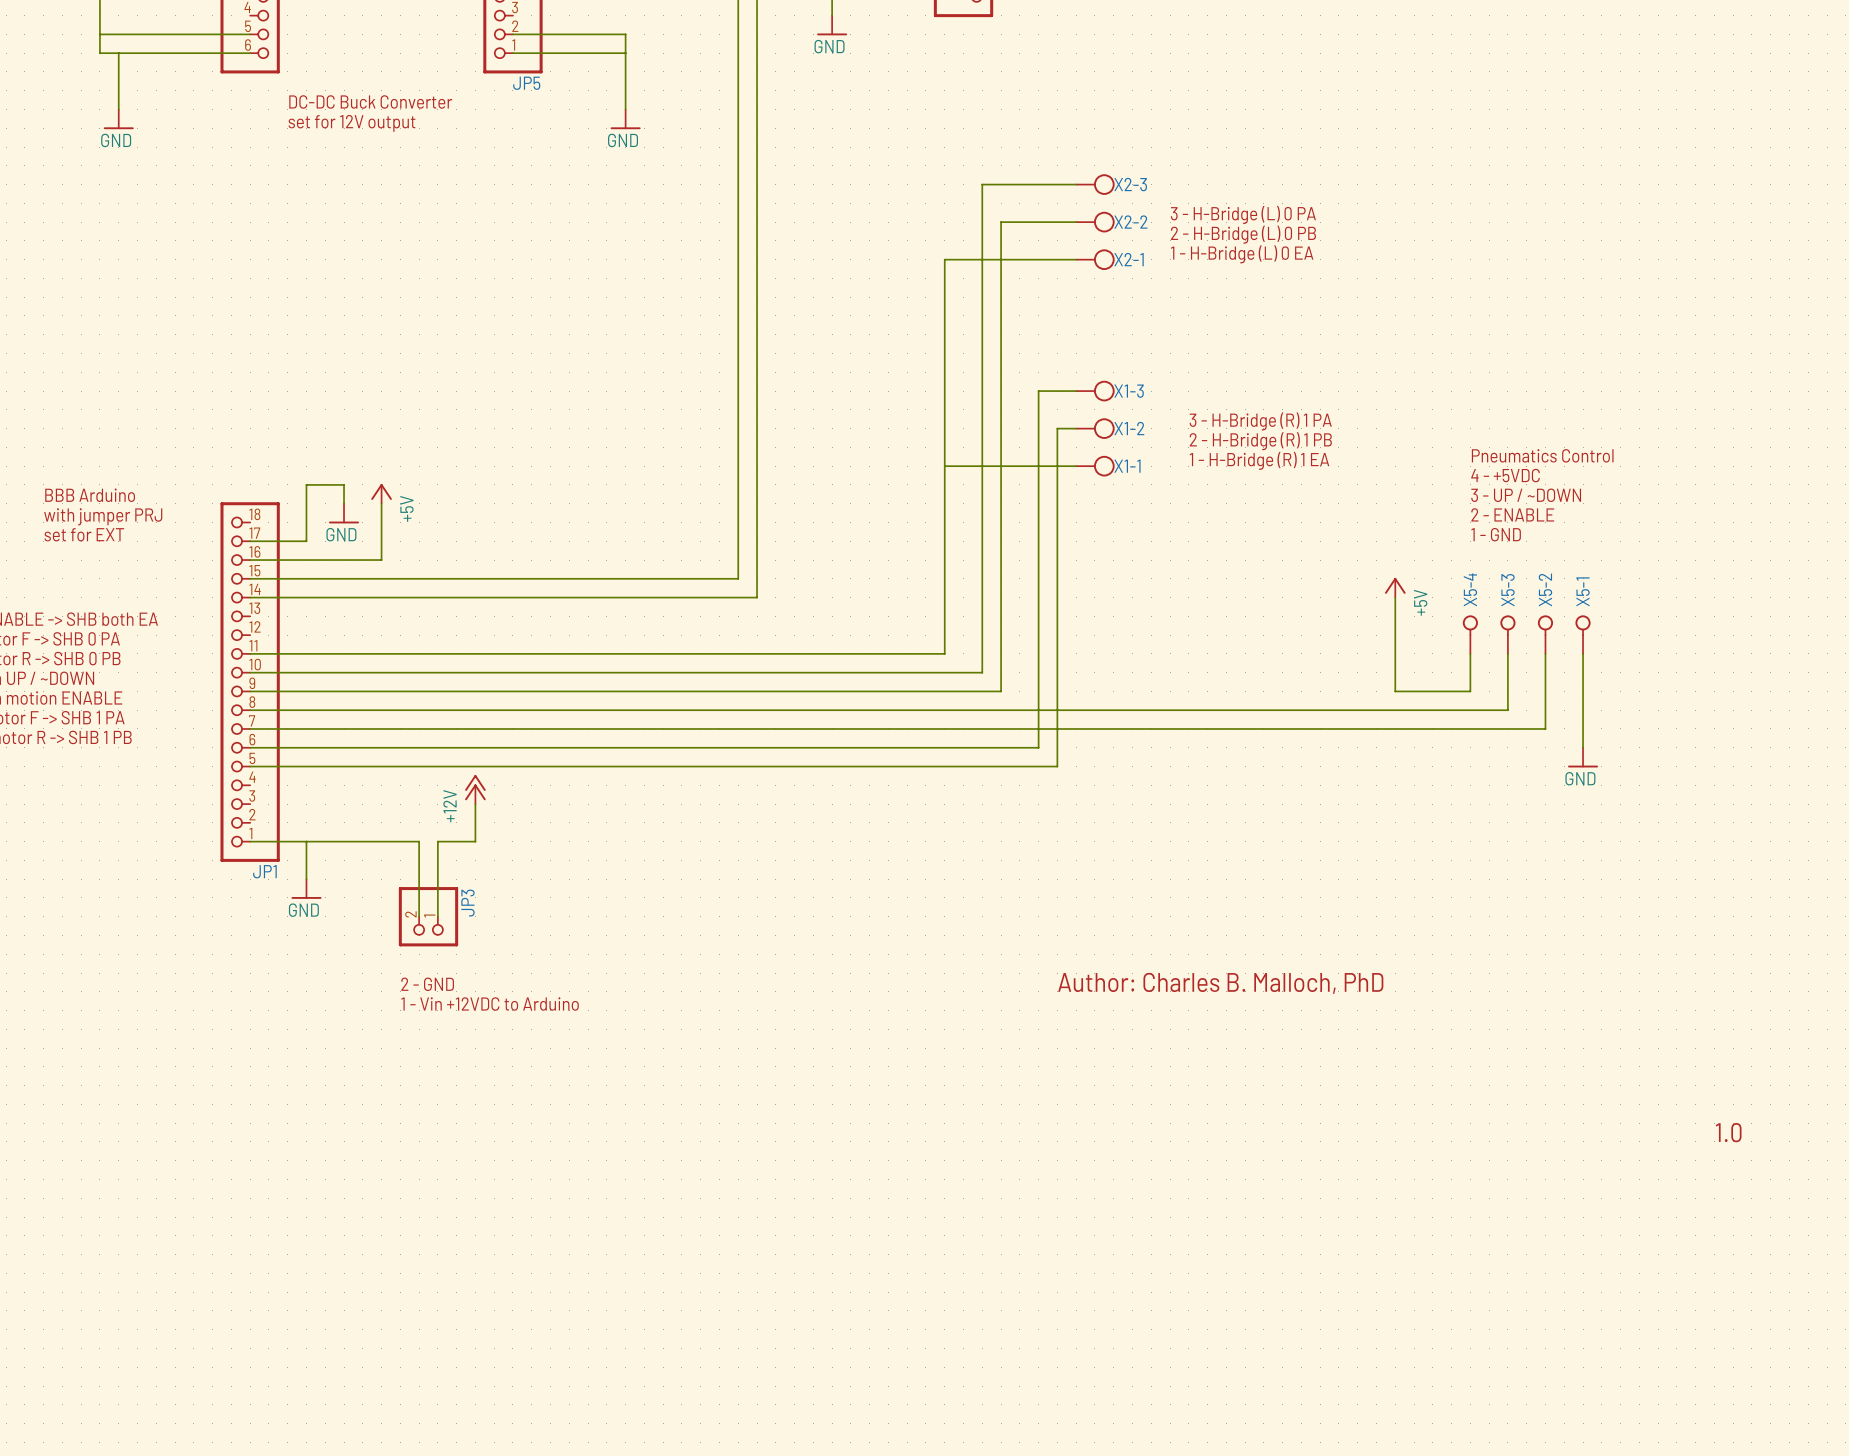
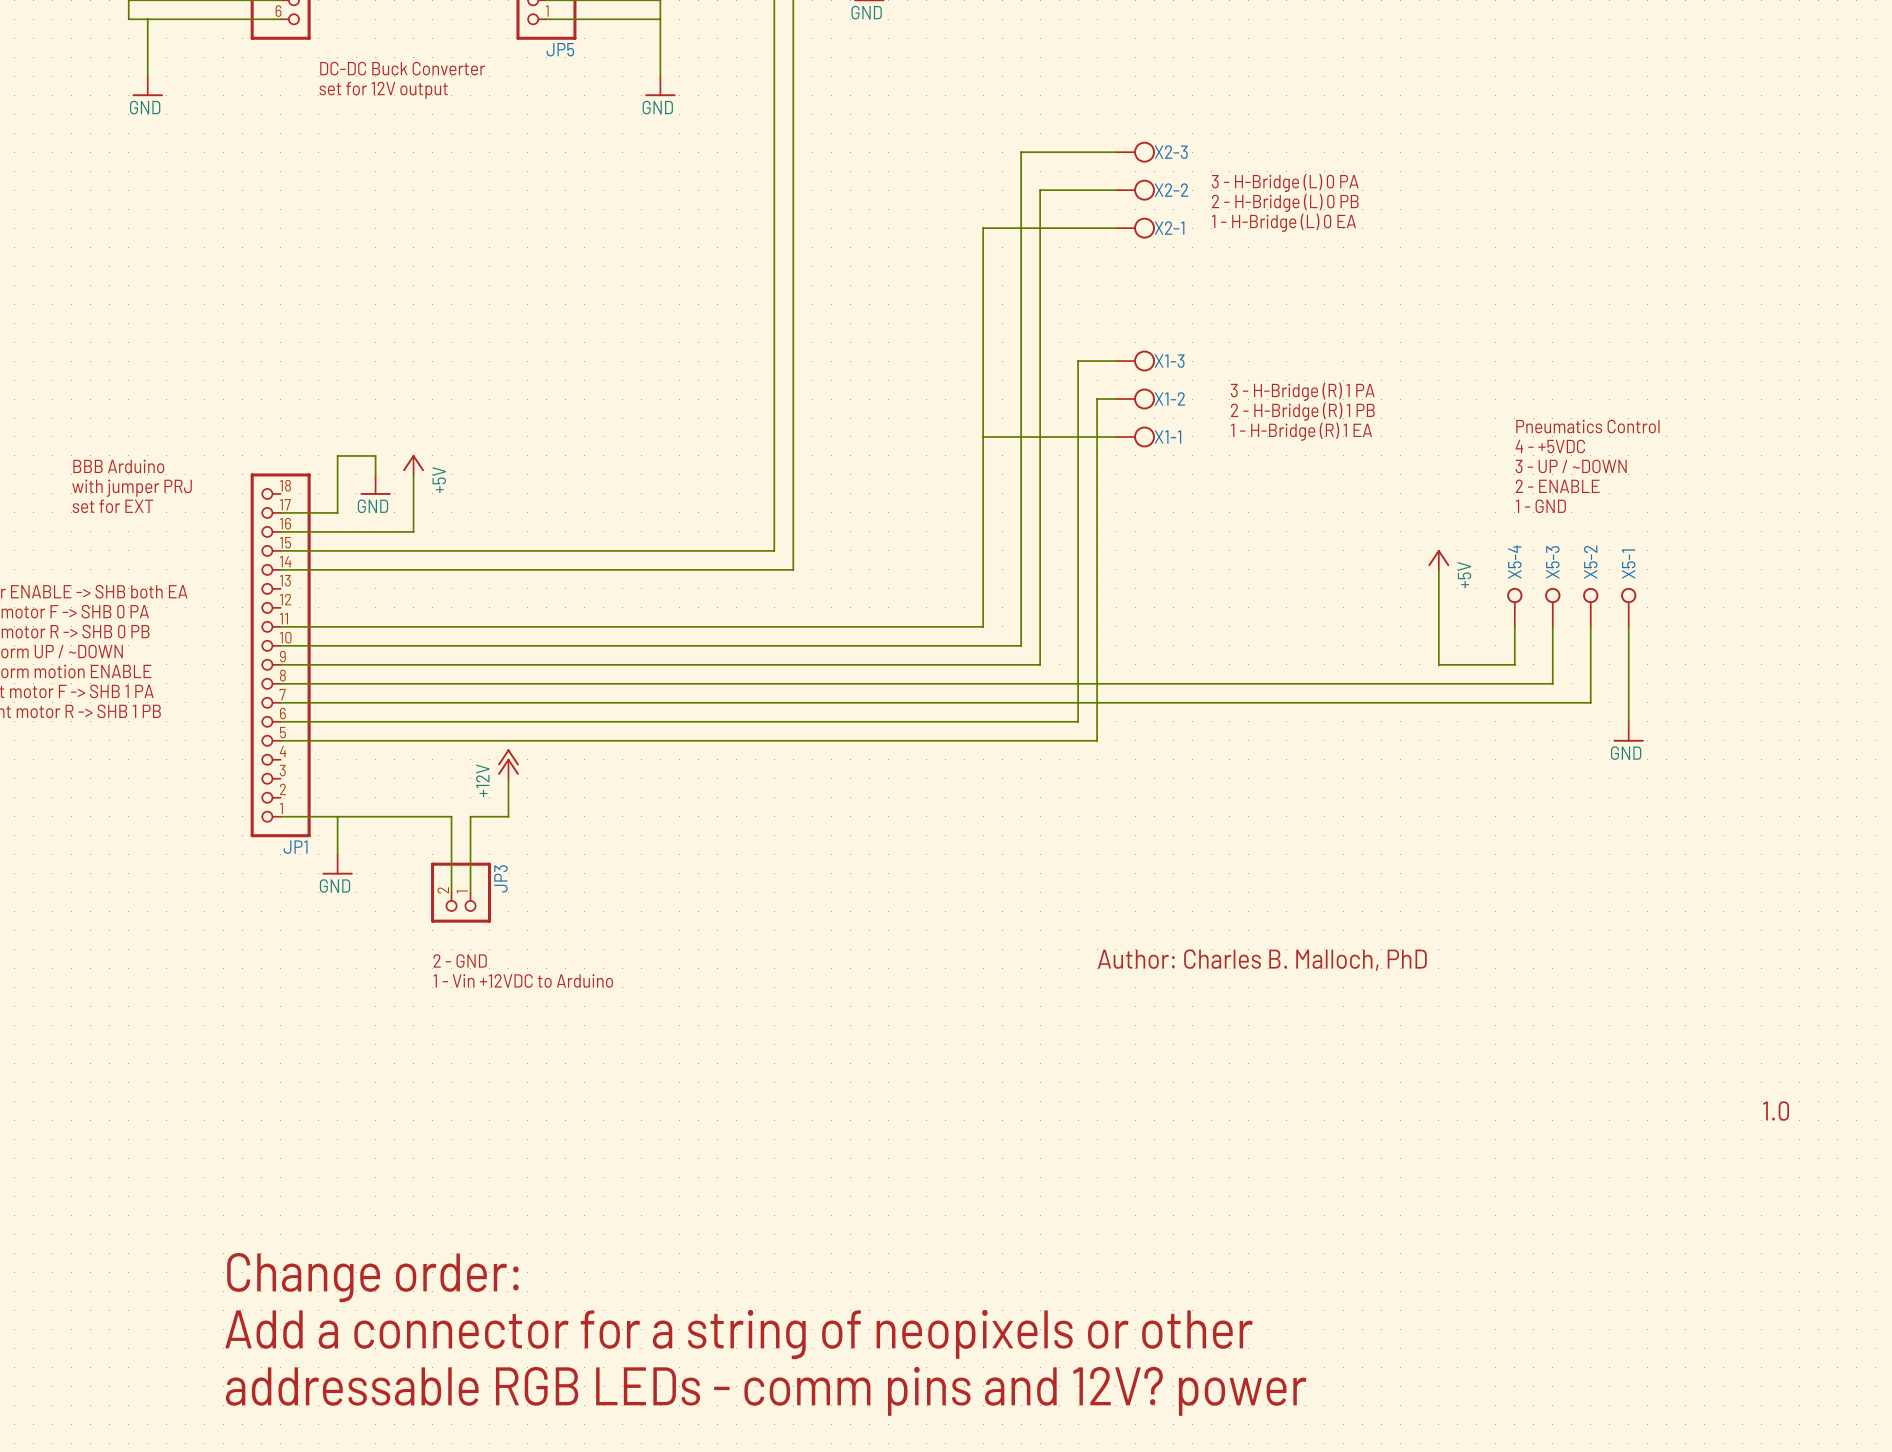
text: none -> Change order: (372, 1277)
text: none -> Add a connector for a string of neopixels or other (739, 1334)
text: none -> addressable RGB LEDs - comm pins and 12V? power (766, 1391)

